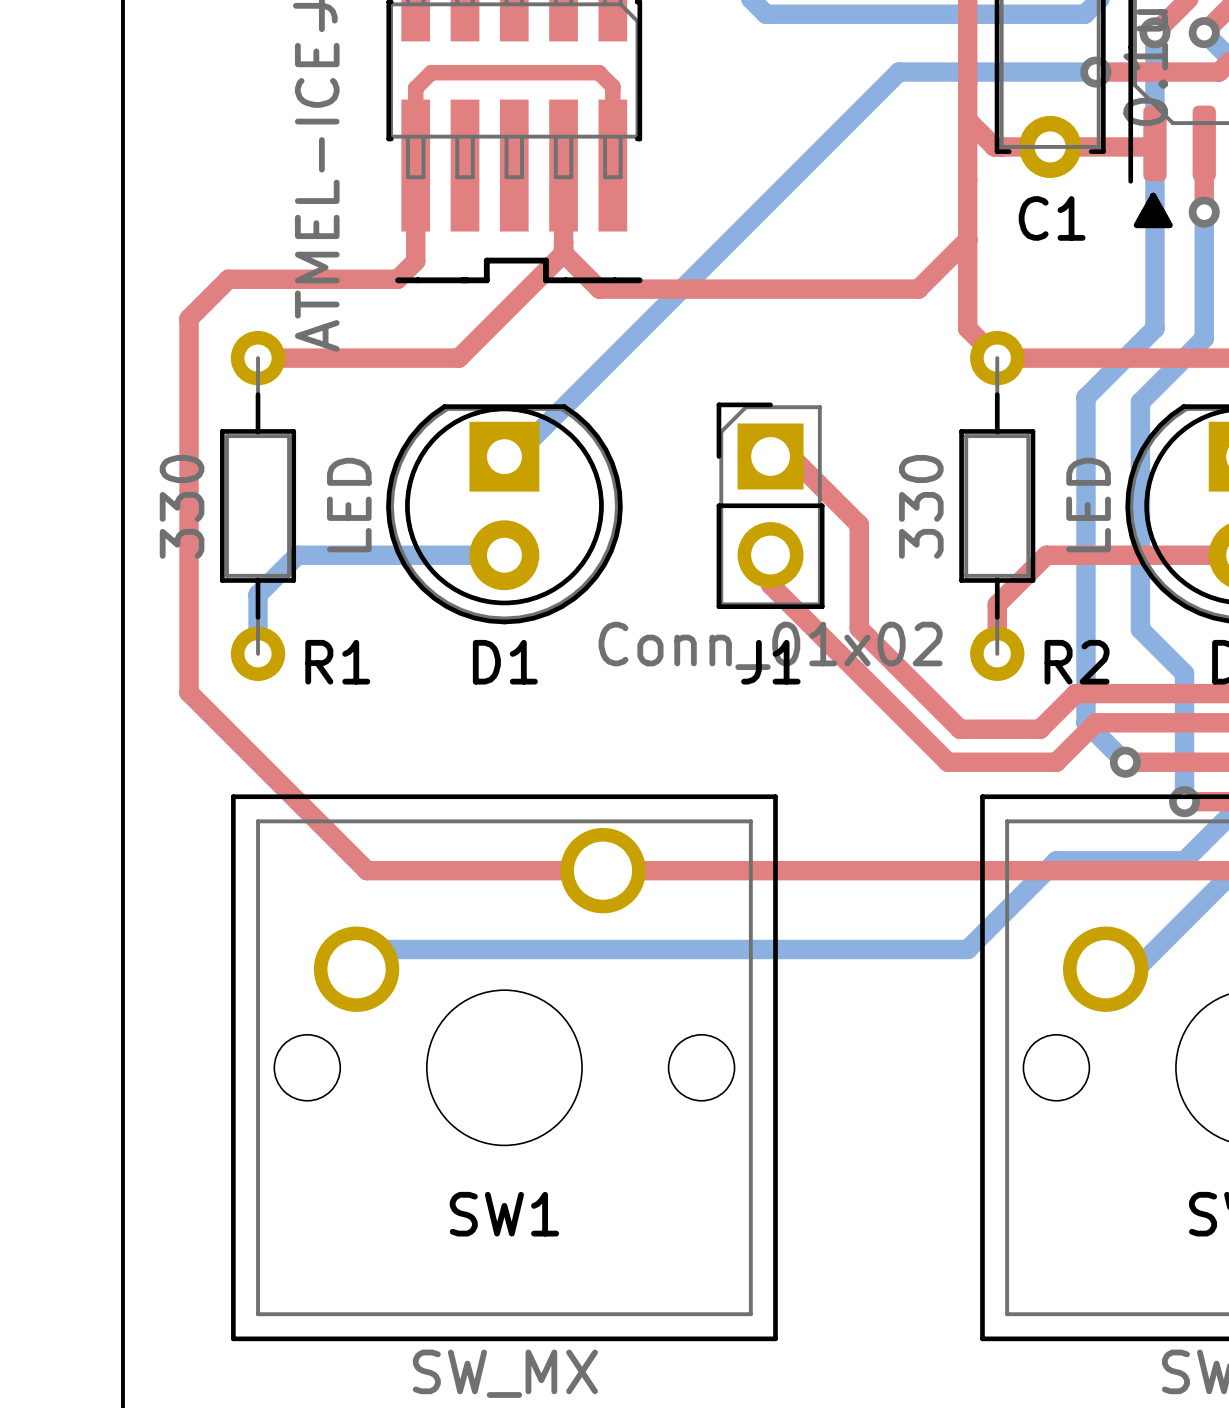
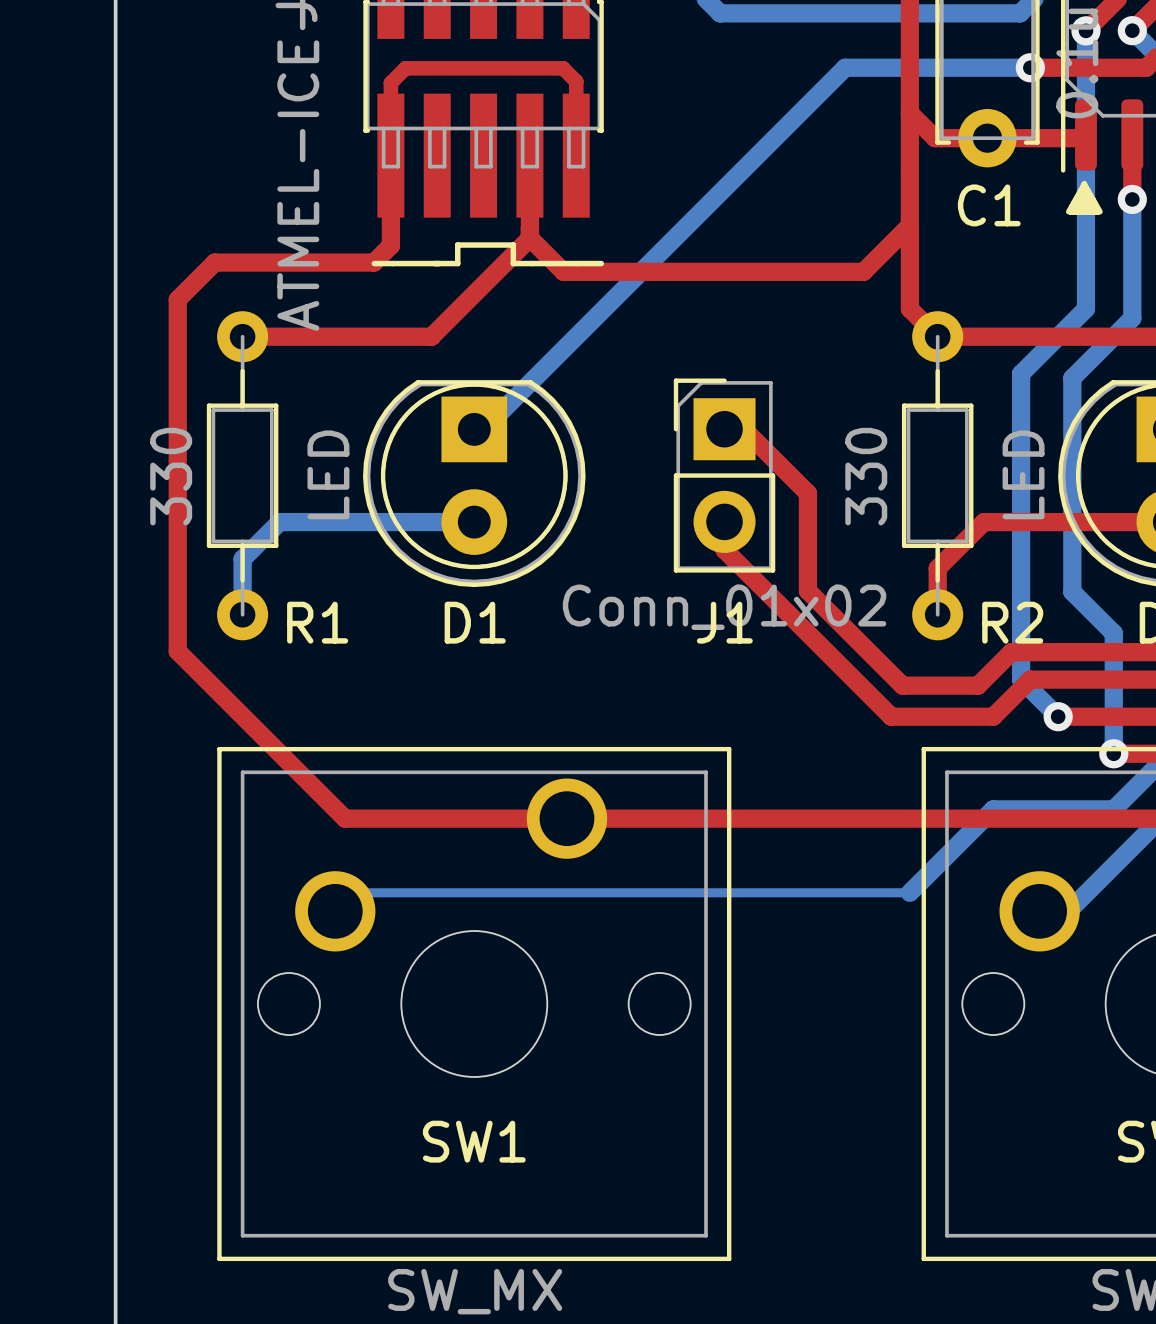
bottom track width: thick (376, 949) (967, 949) -> thin (353, 892) (909, 892)

